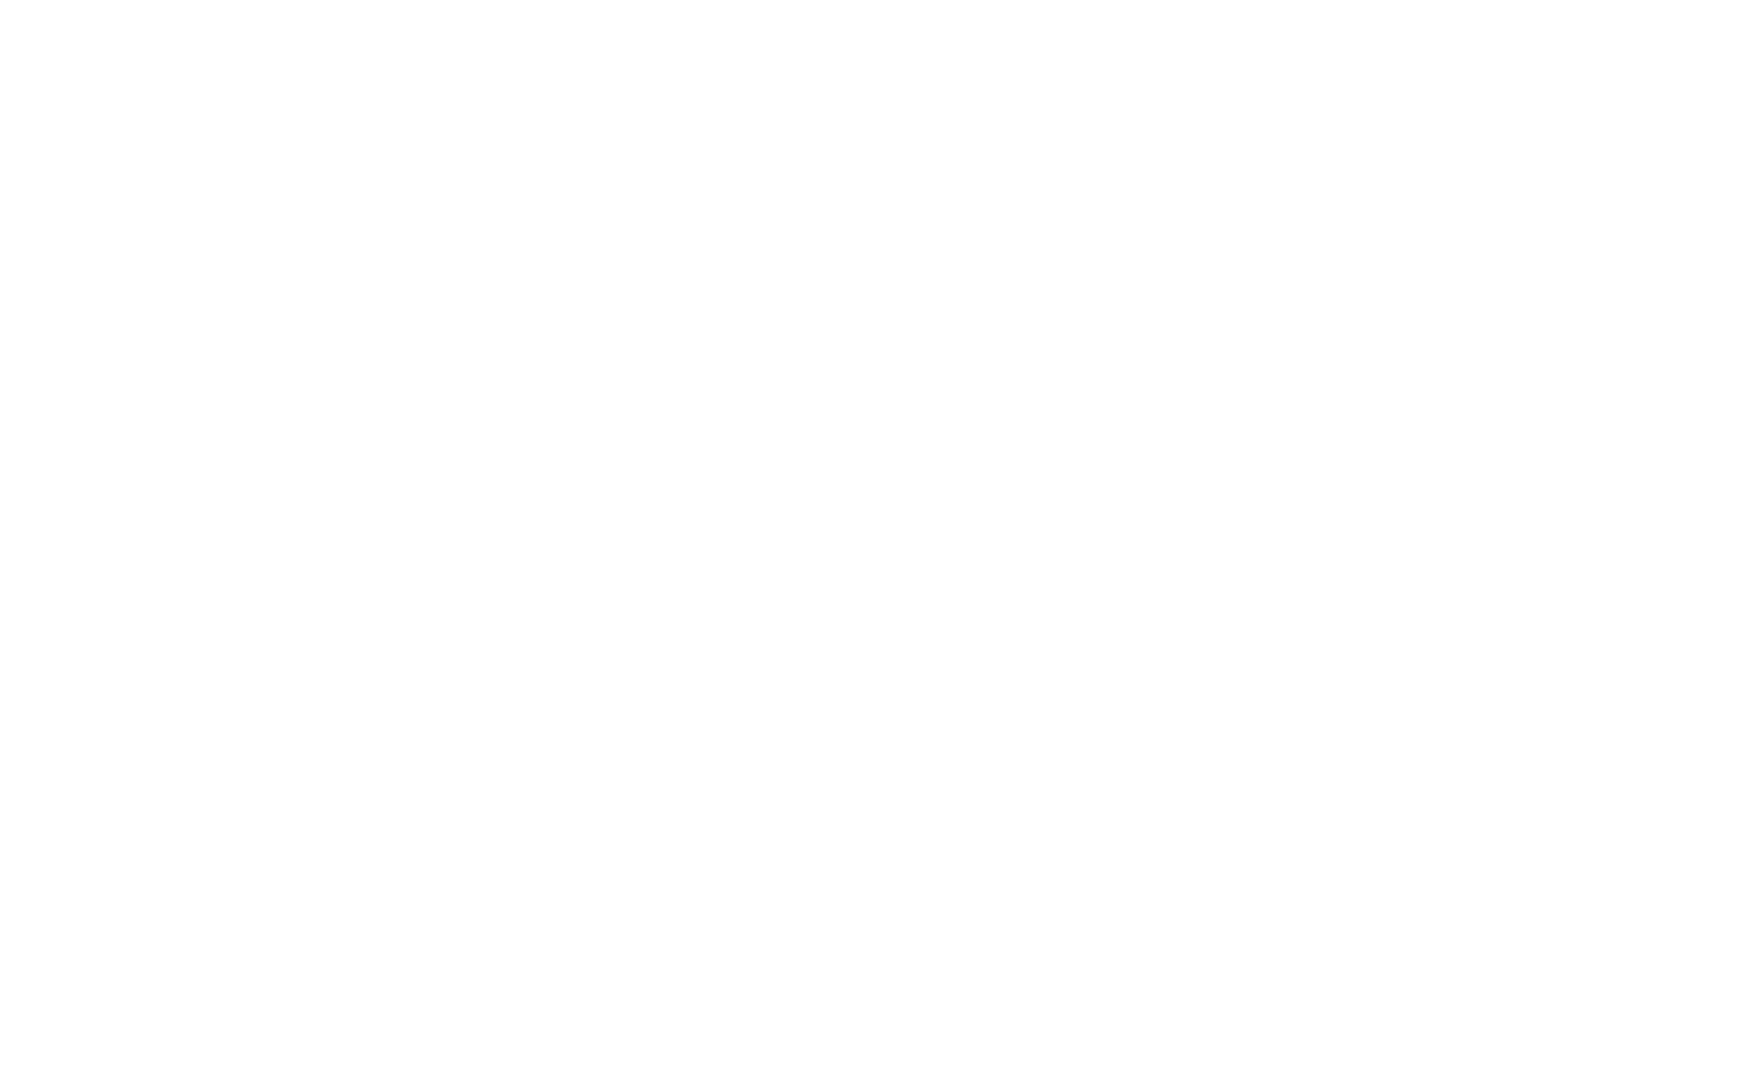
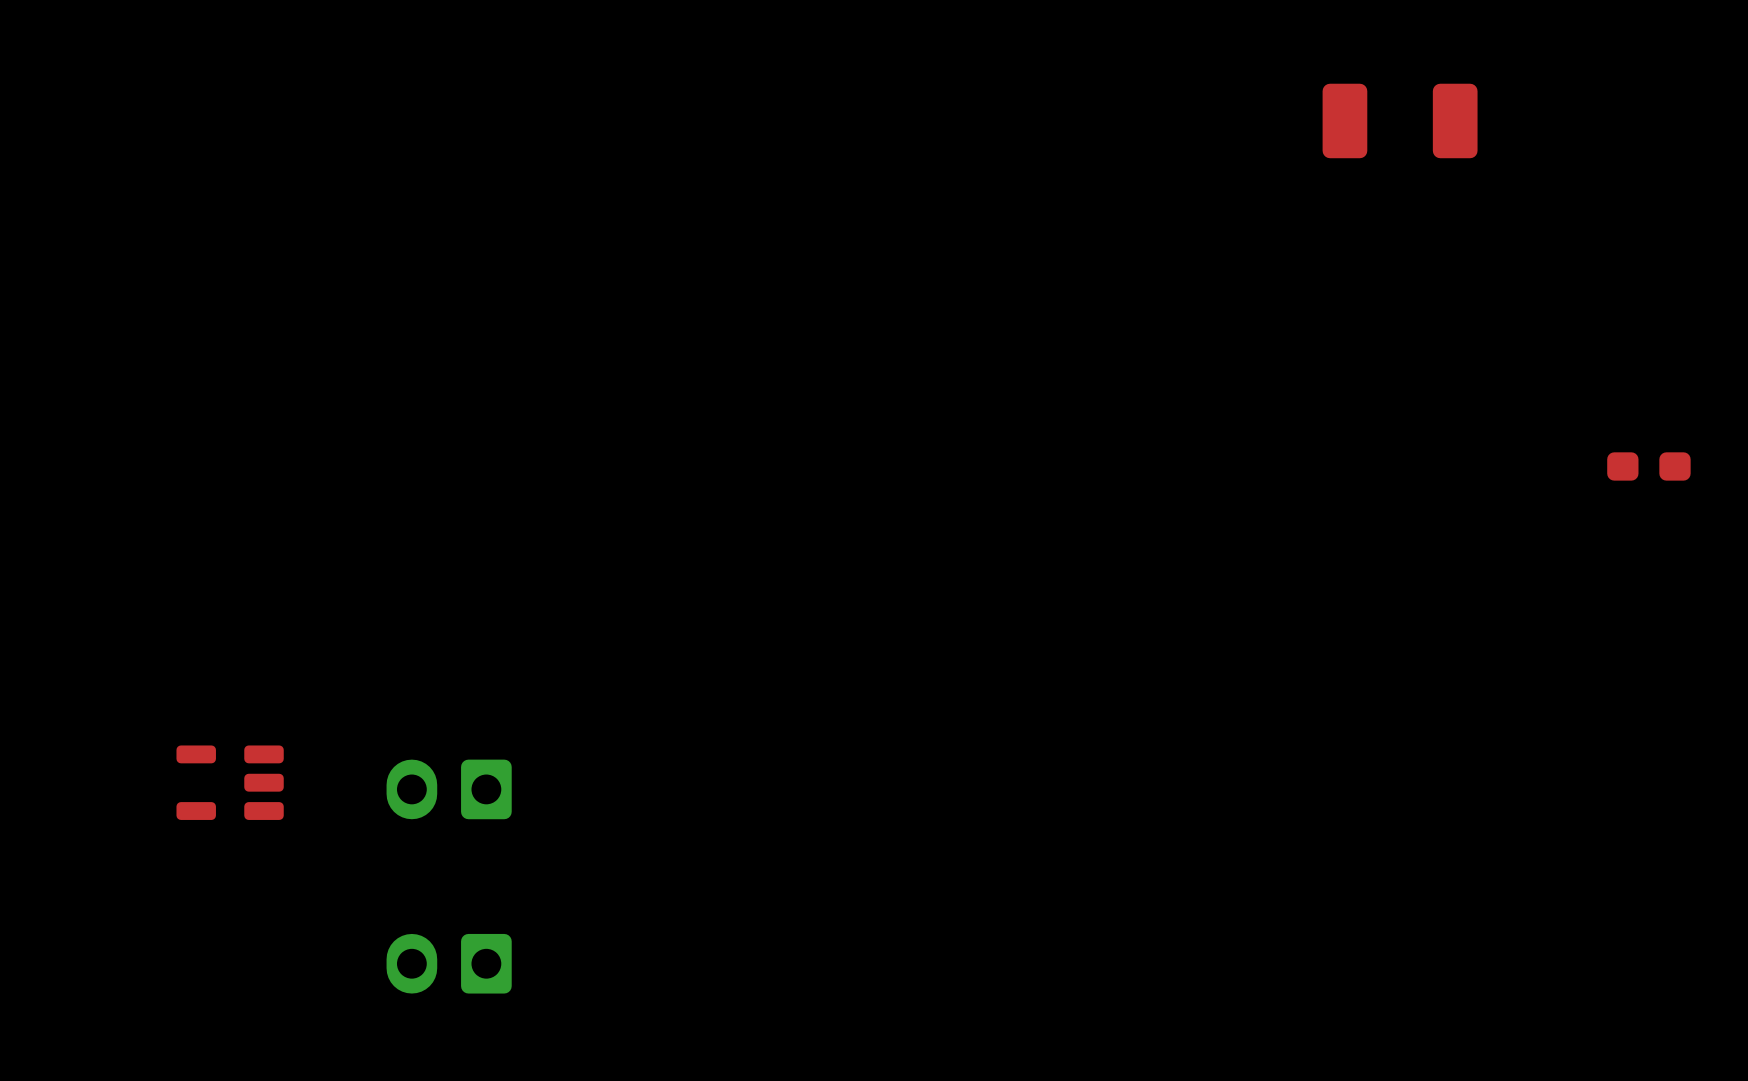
part: none -> (1400, 120)
part: none -> (1648, 466)
part: none -> (230, 782)
part: none -> (449, 789)
part: none -> (449, 963)

